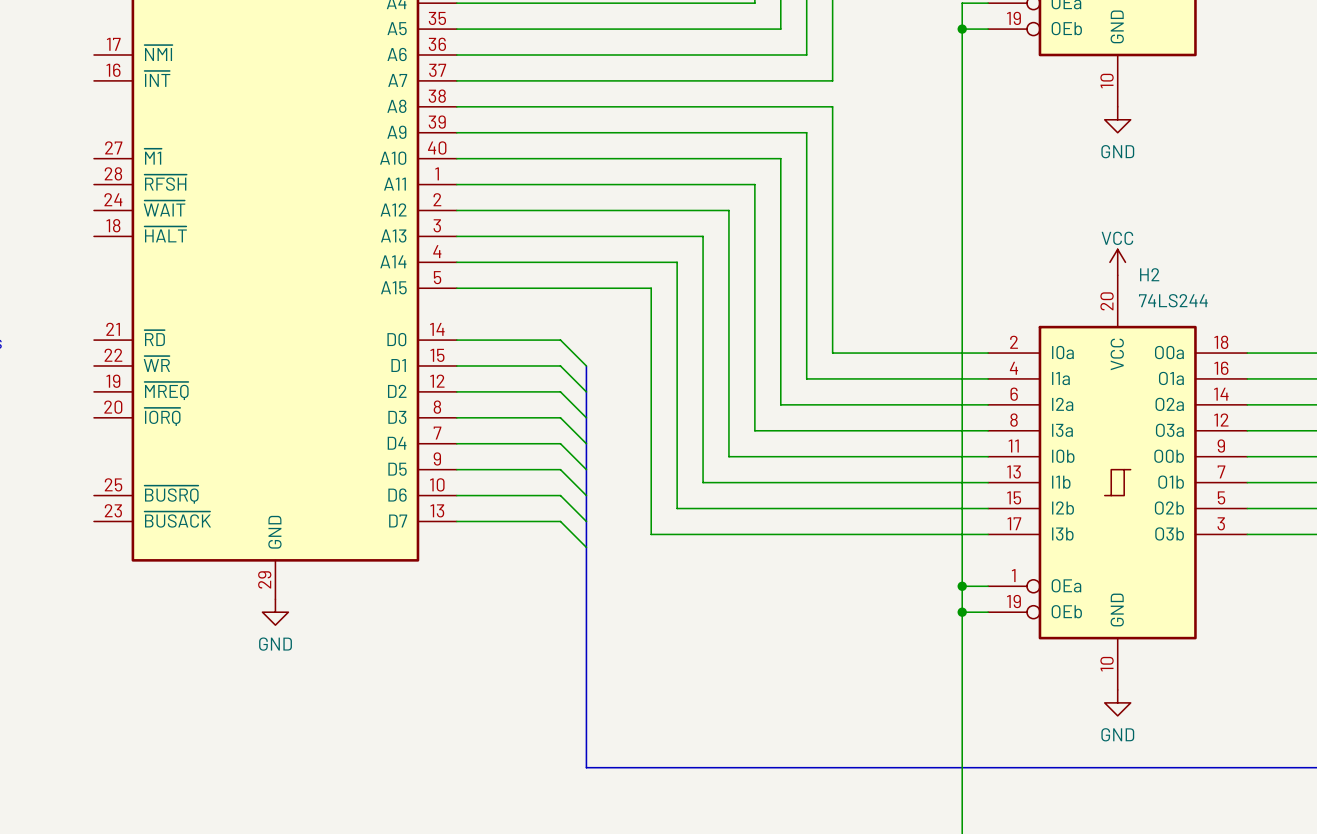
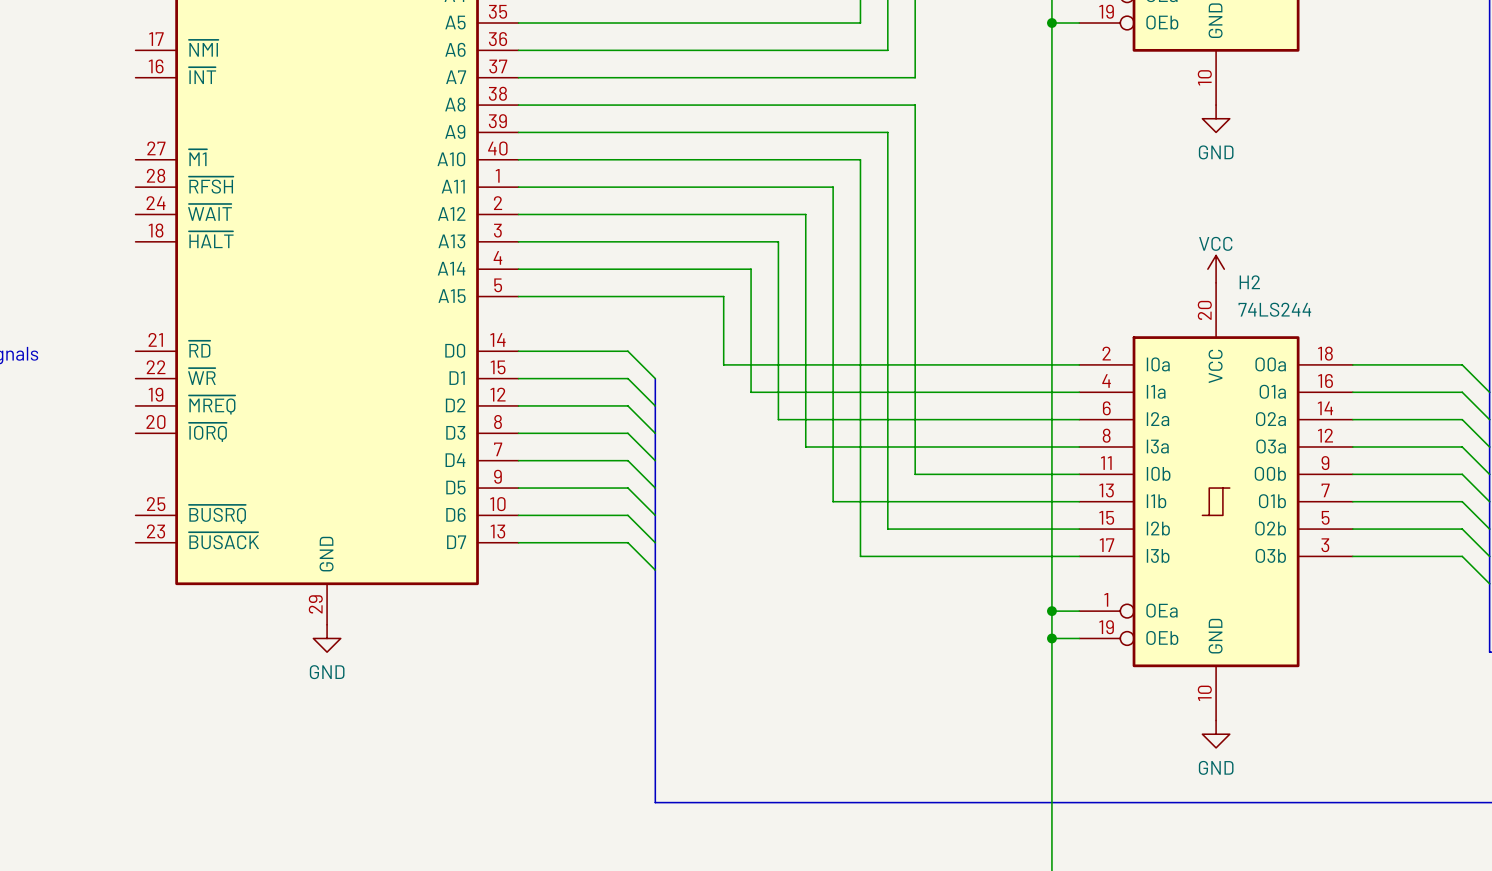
wire: (651, 353) (651, 534) (780, 534) -> (778, 419) (860, 419) (860, 556)
wire: (677, 378) (677, 508) (806, 508) -> (751, 392) (887, 392) (887, 529)
wire: (703, 404) (703, 482) (754, 482) -> (805, 446) (833, 446) (833, 501)
wire: (728, 430) (728, 456) (832, 456) -> (723, 364) (915, 364) (915, 474)

